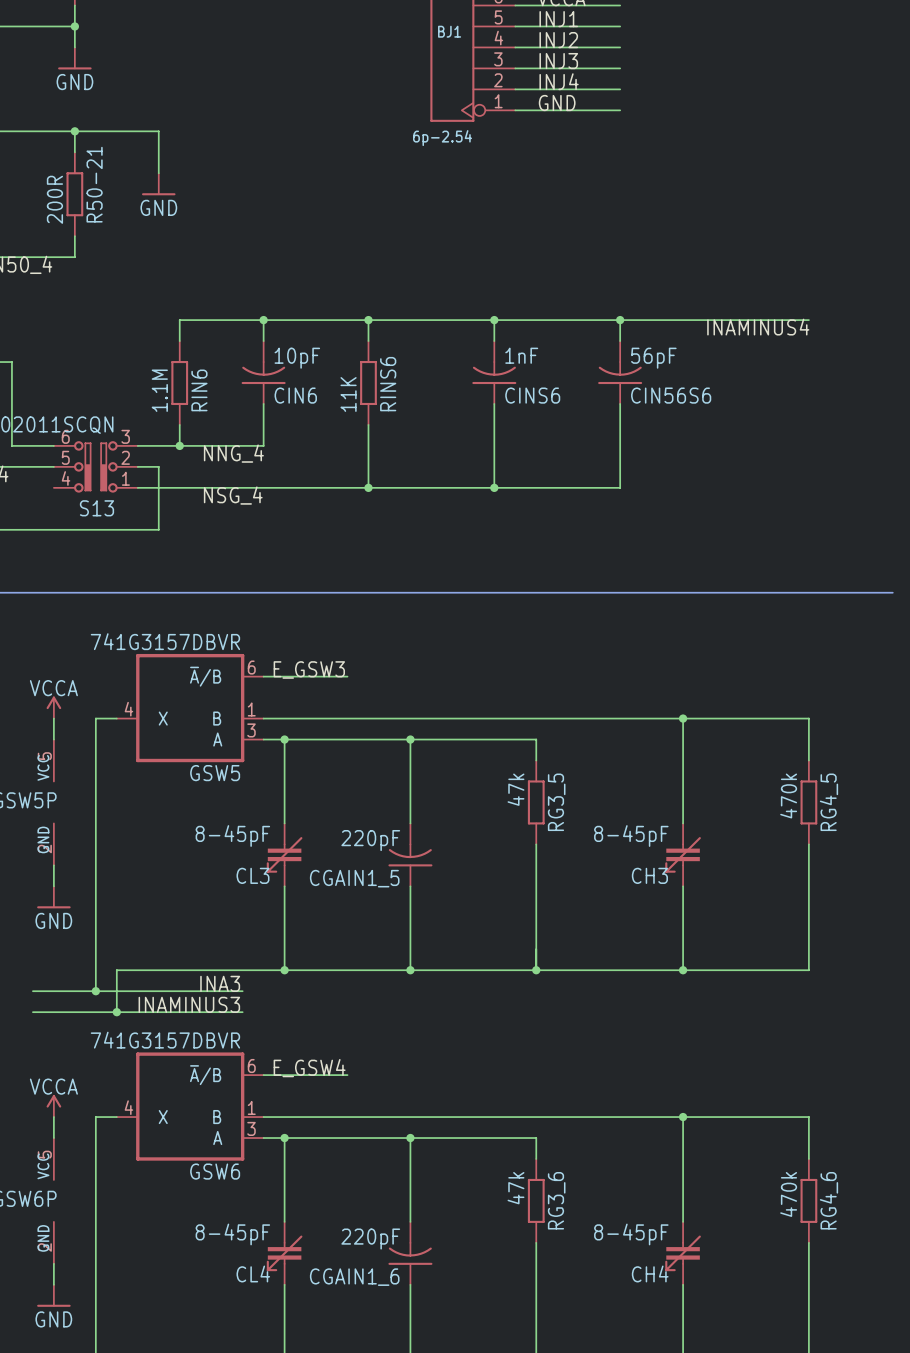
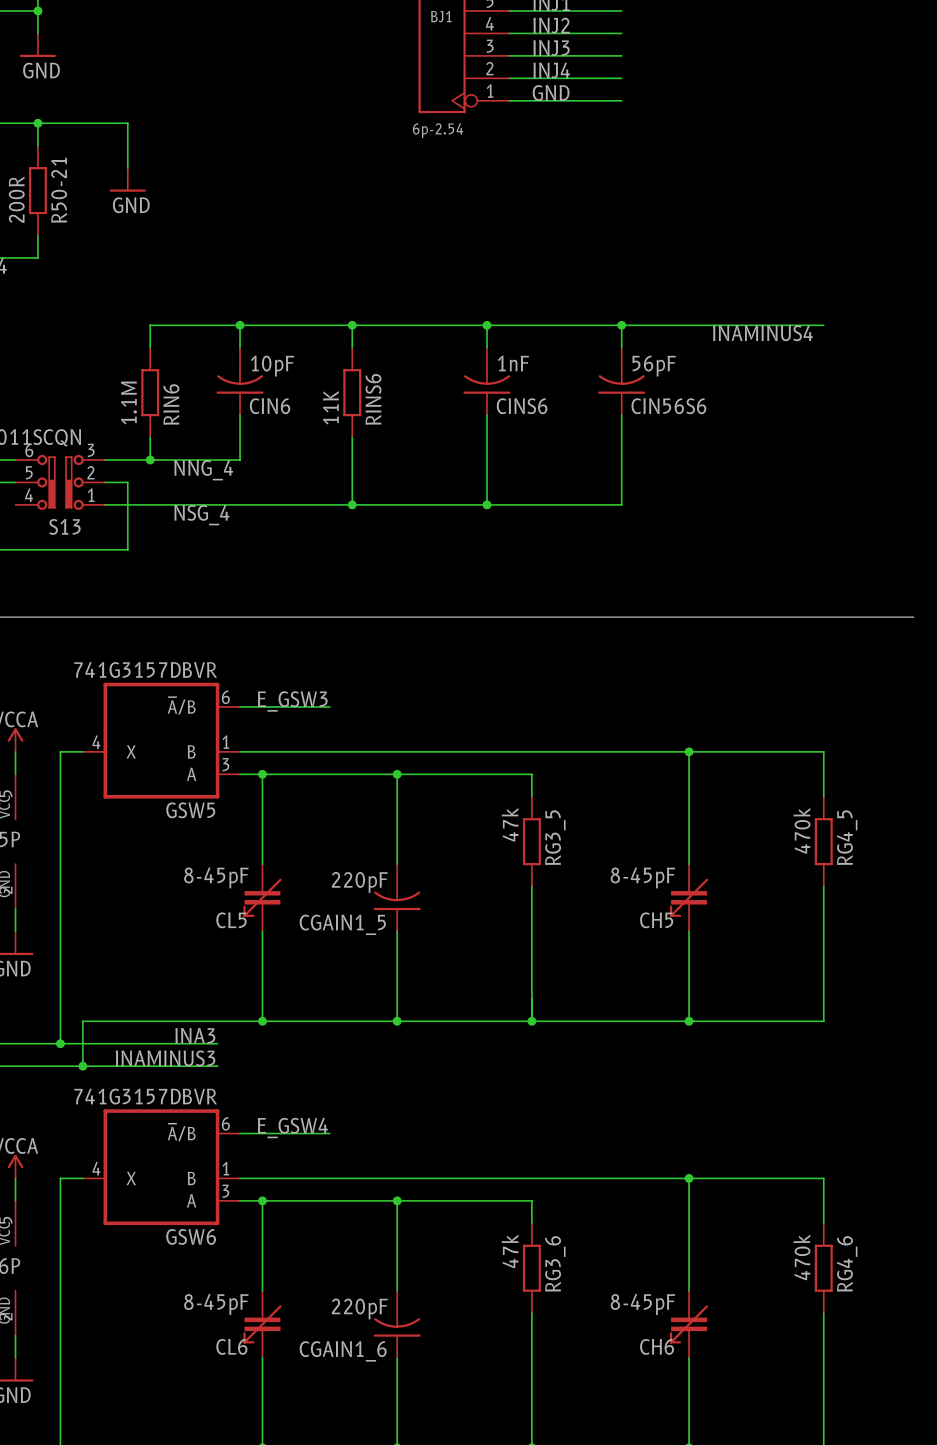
CL3 name: CL3 (252, 875) -> CL5 (231, 920)
CH3 name: CH3 (649, 875) -> CH5 (656, 920)
CL4 name: CL4 (253, 1273) -> CL6 (231, 1346)
CH4 name: CH4 (650, 1273) -> CH6 (657, 1346)

